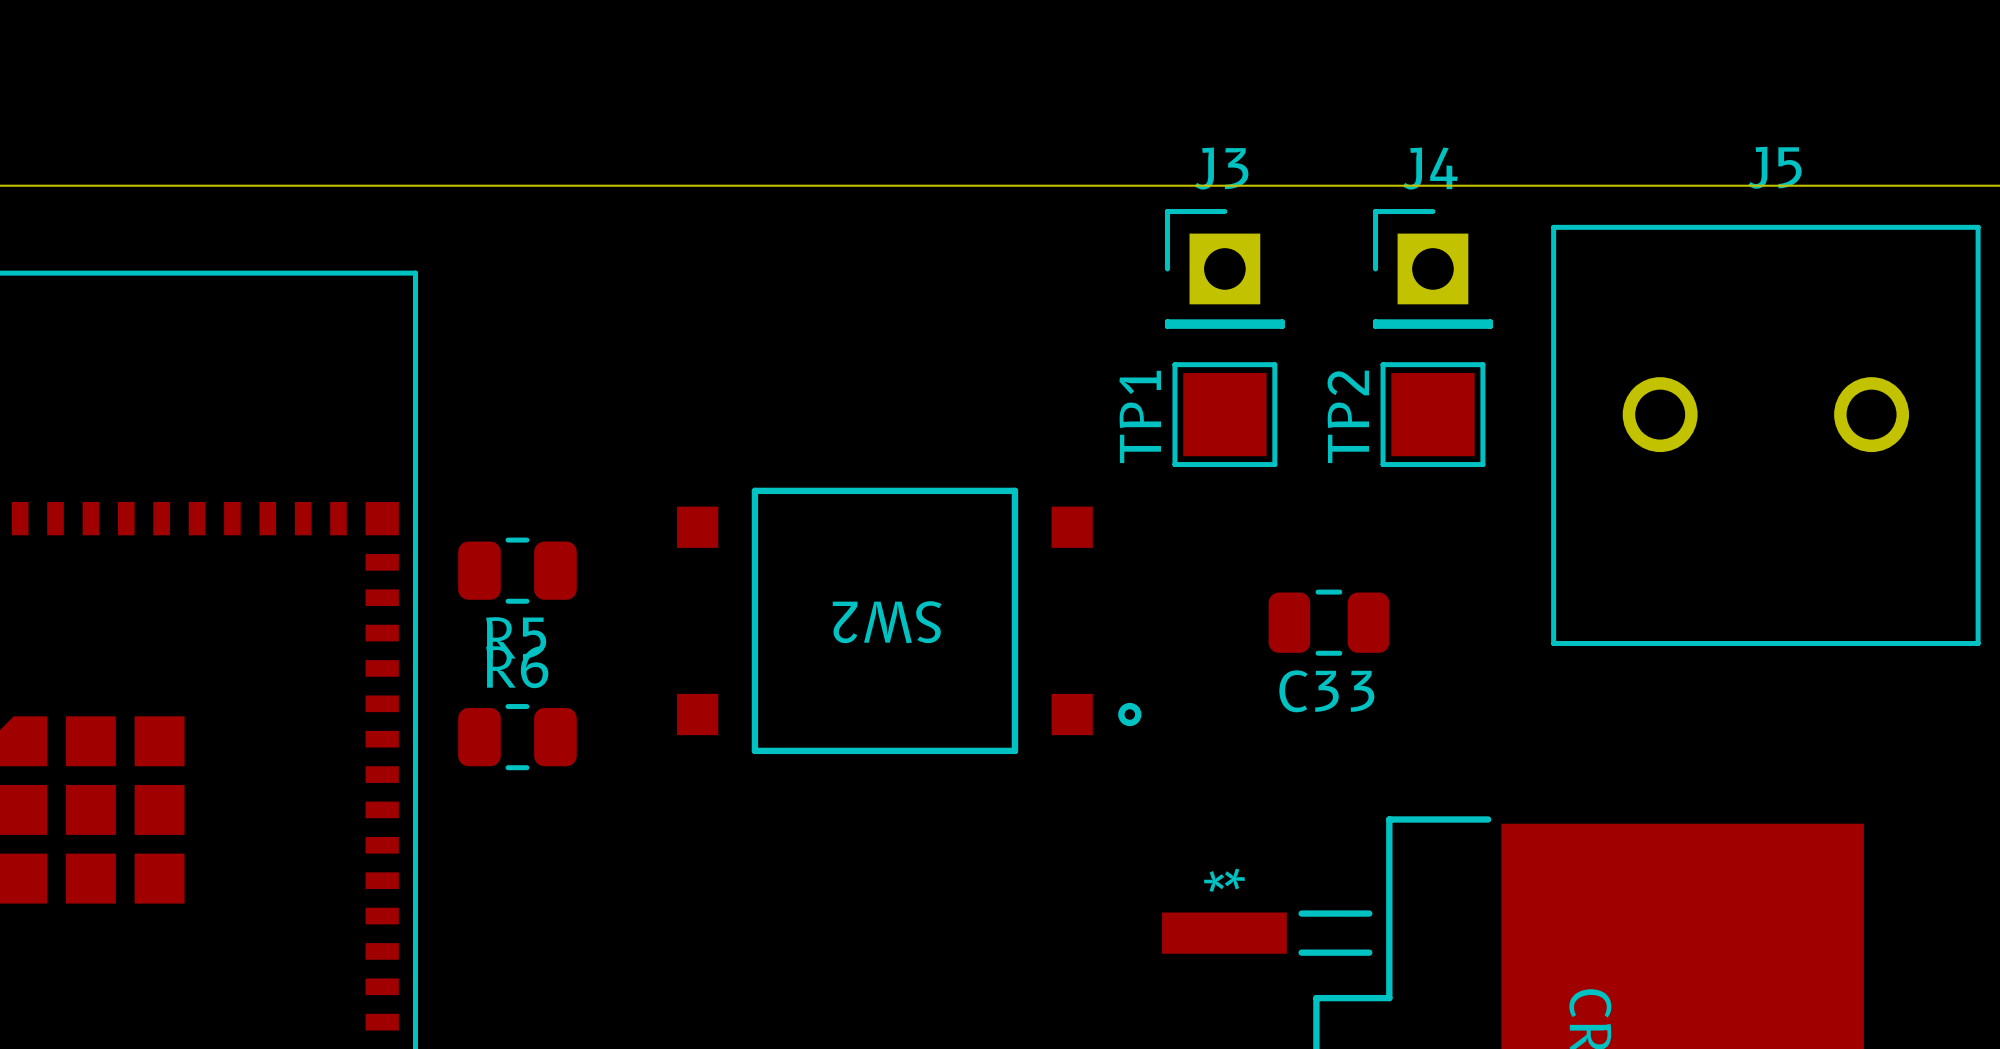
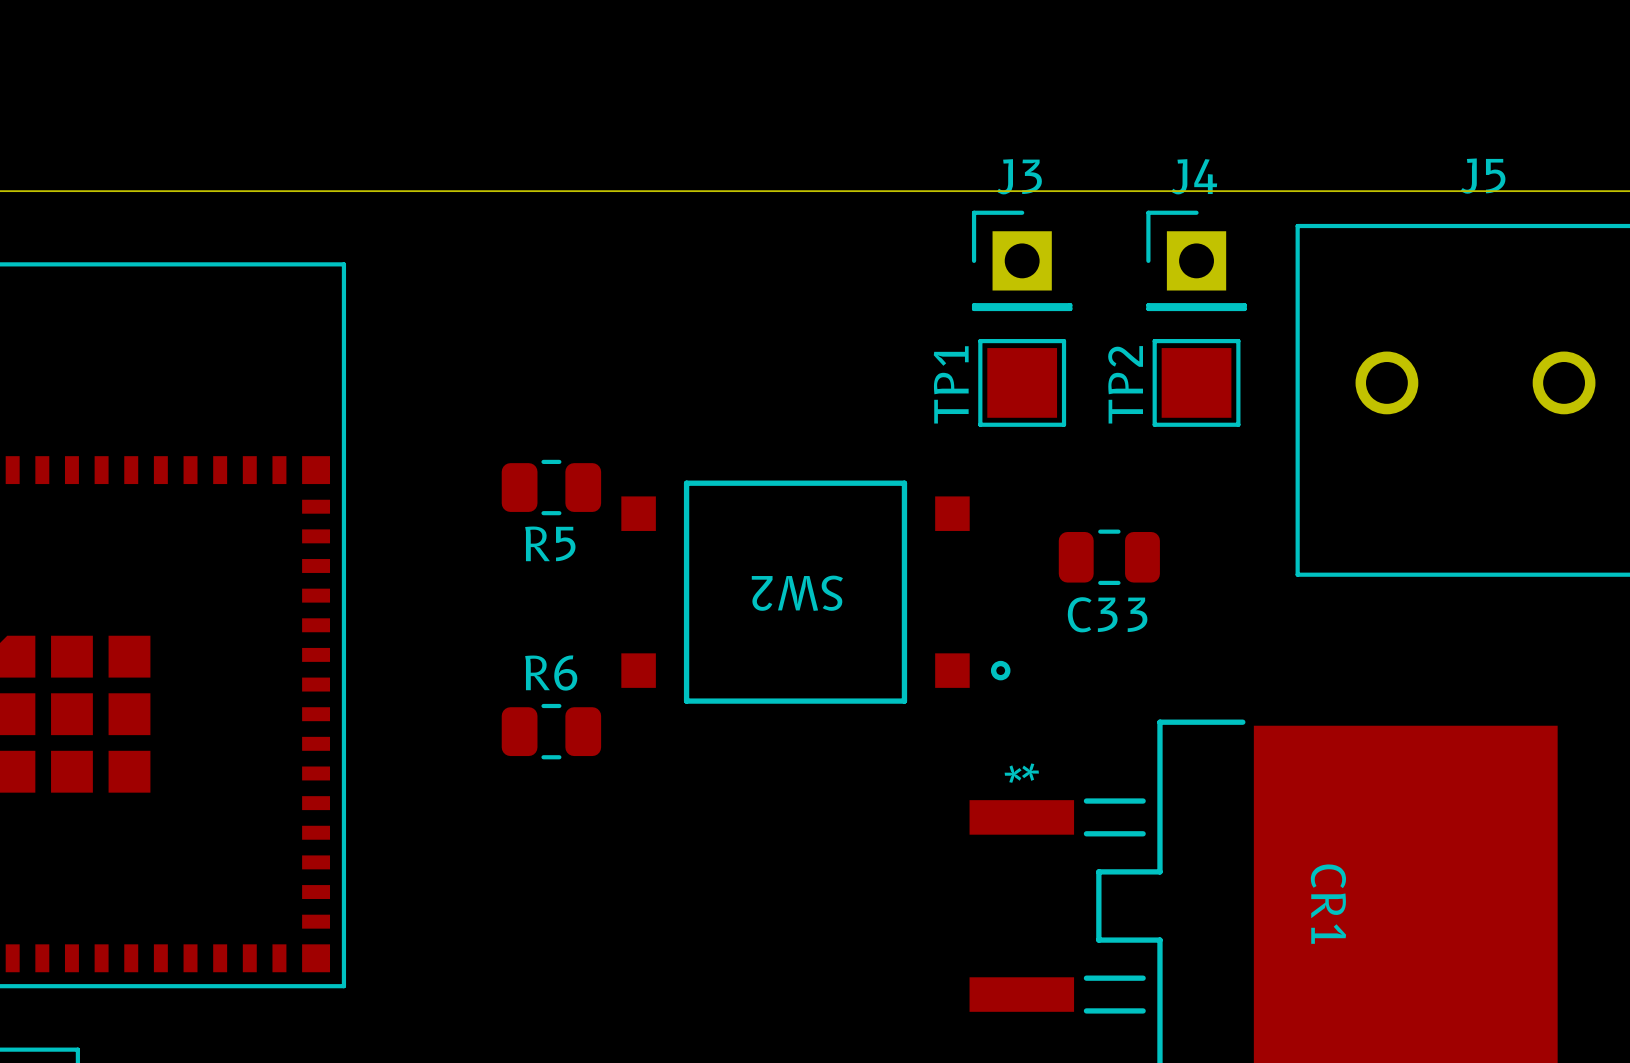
R5 position: (517, 570) -> (551, 487)
SW2 position: (909, 620) -> (815, 592)
R6 position: (517, 737) -> (551, 731)

